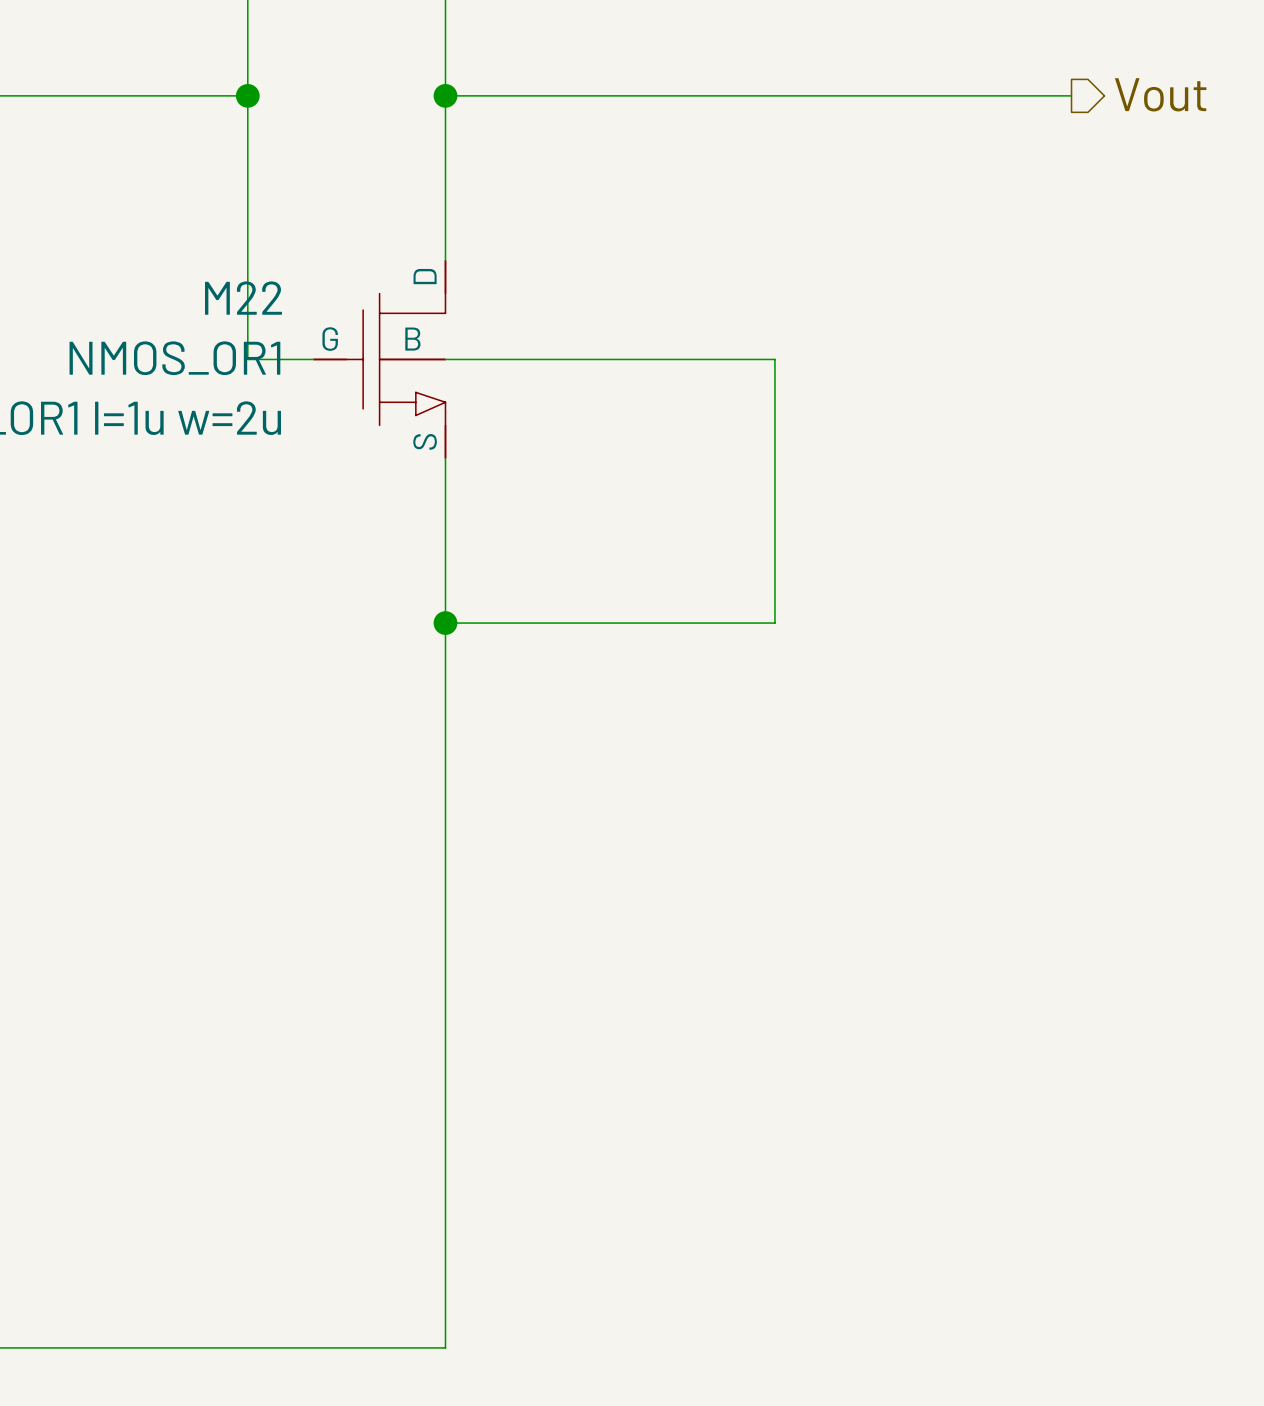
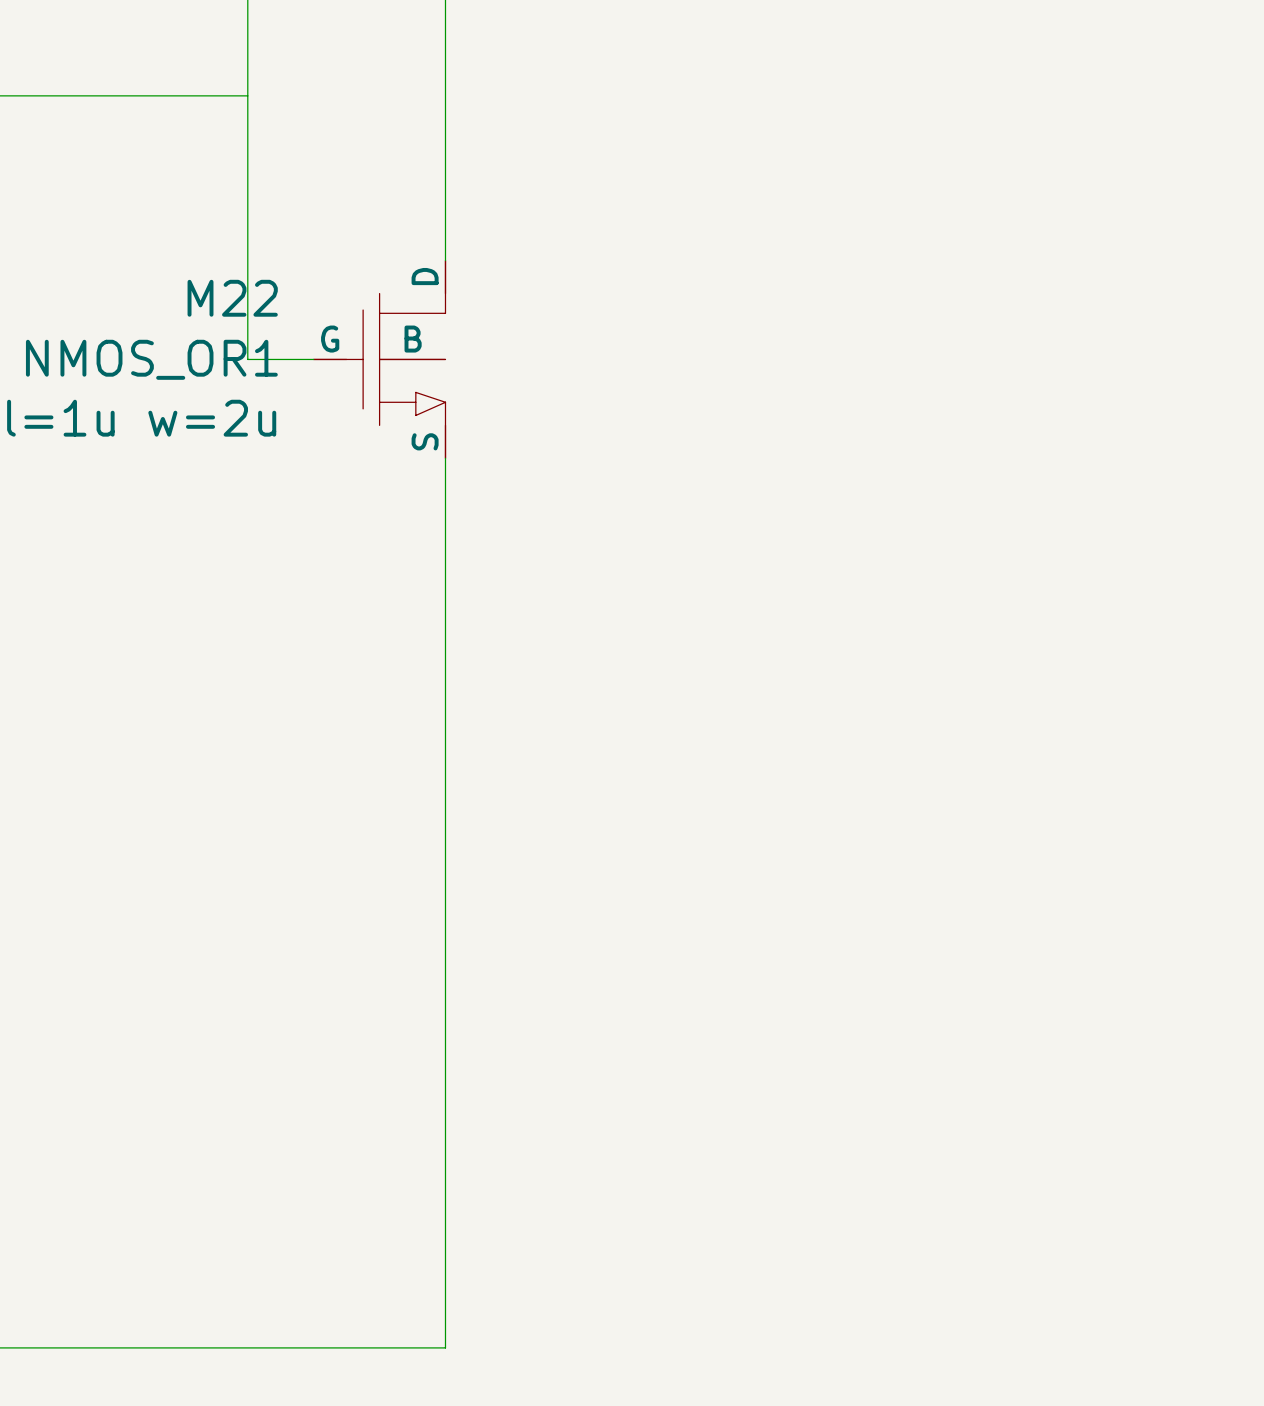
hierarchical label: Vout (1160, 94) -> none
junction: (247, 95) -> none
wire: (445, 95) (1071, 95) -> none
junction: (445, 95) -> none
wire: (445, 359) (774, 359) (774, 623) (445, 623) -> none
junction: (445, 623) -> none

